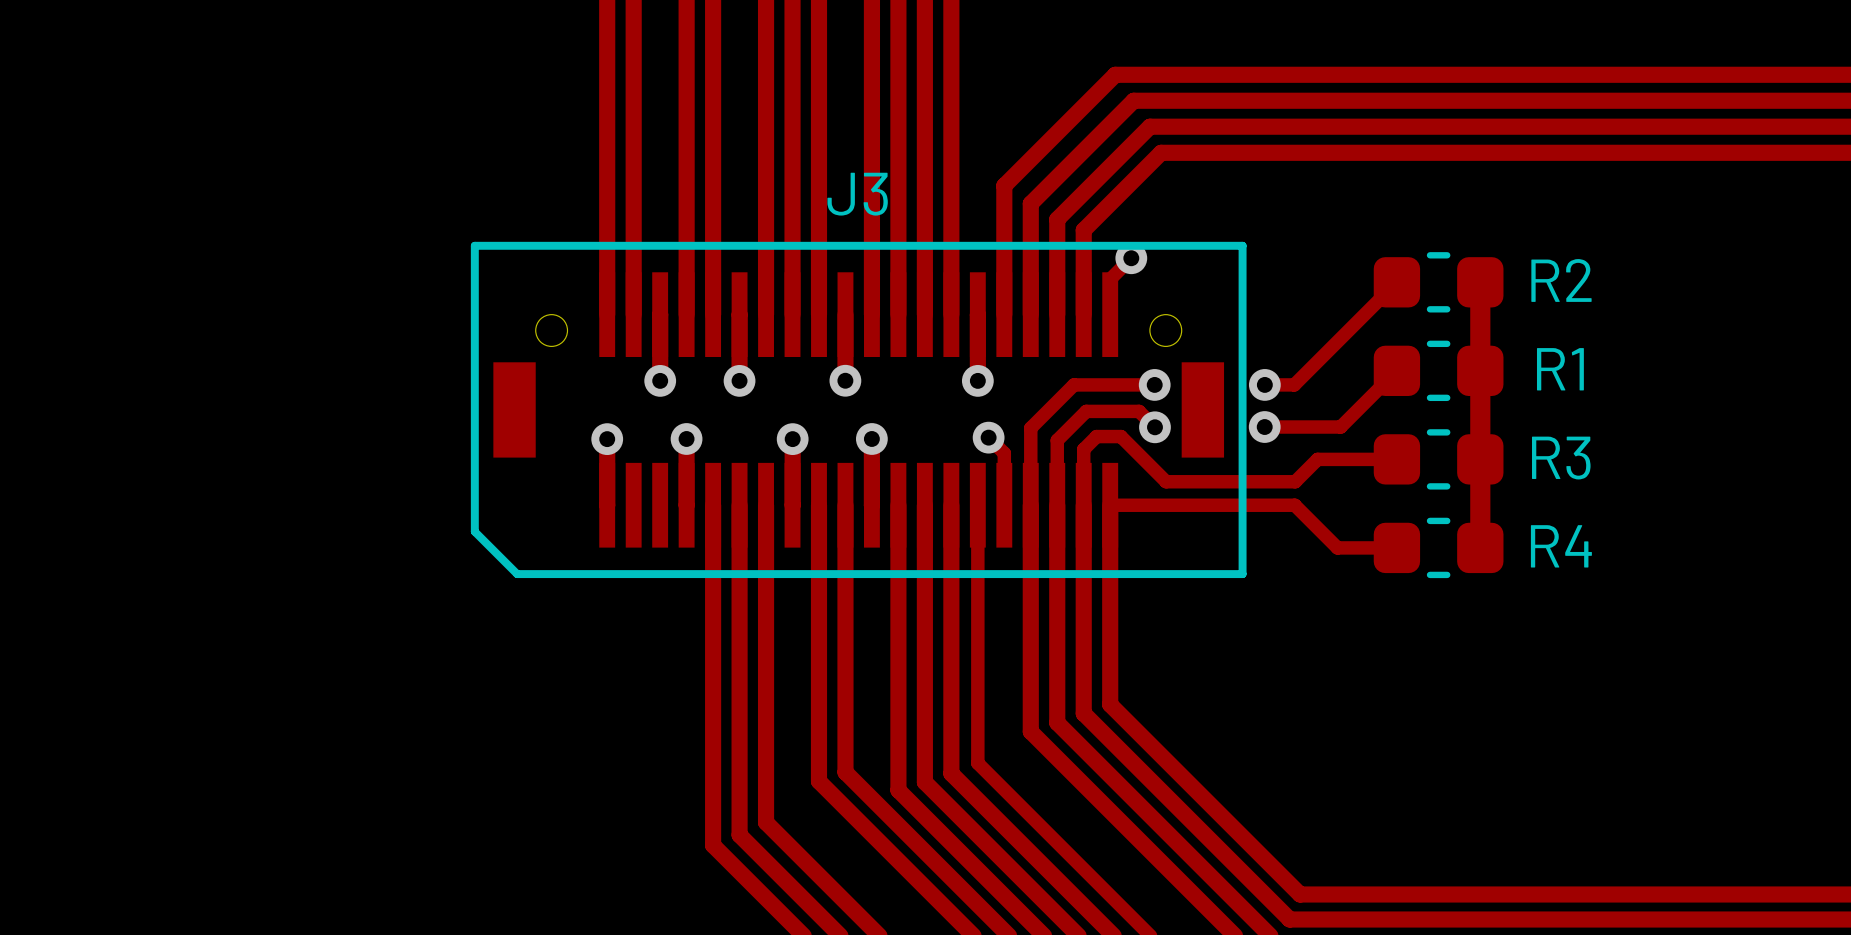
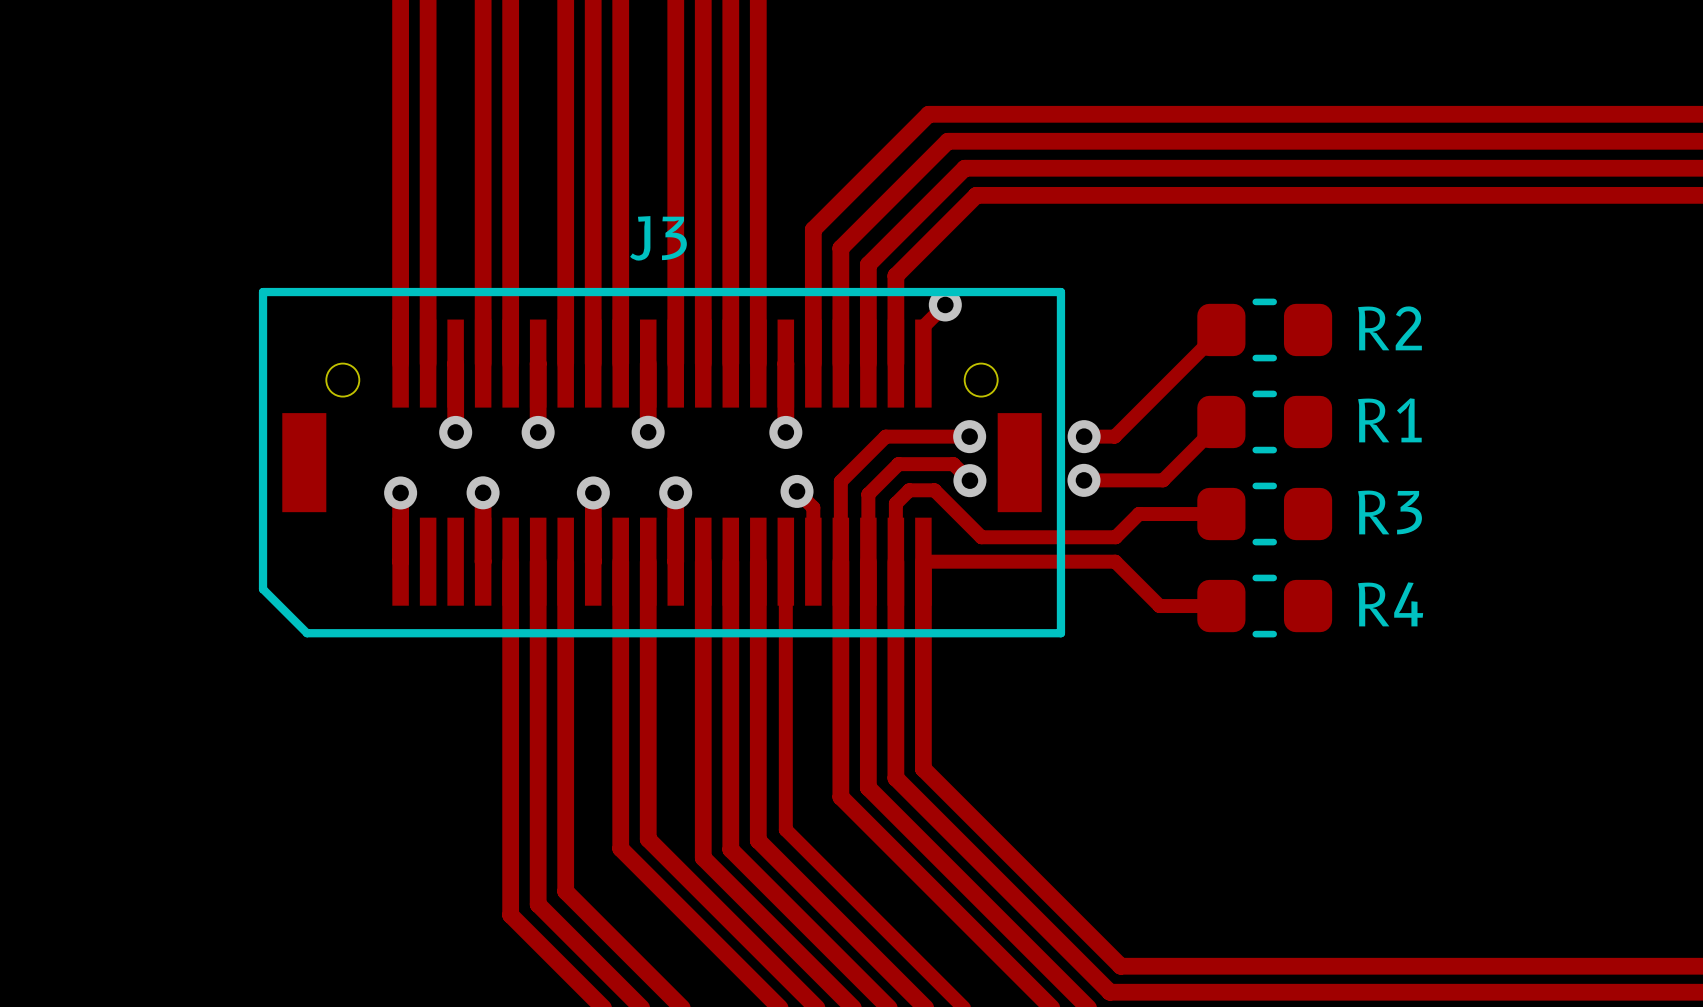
track: (1480, 282) (1480, 547) -> none

